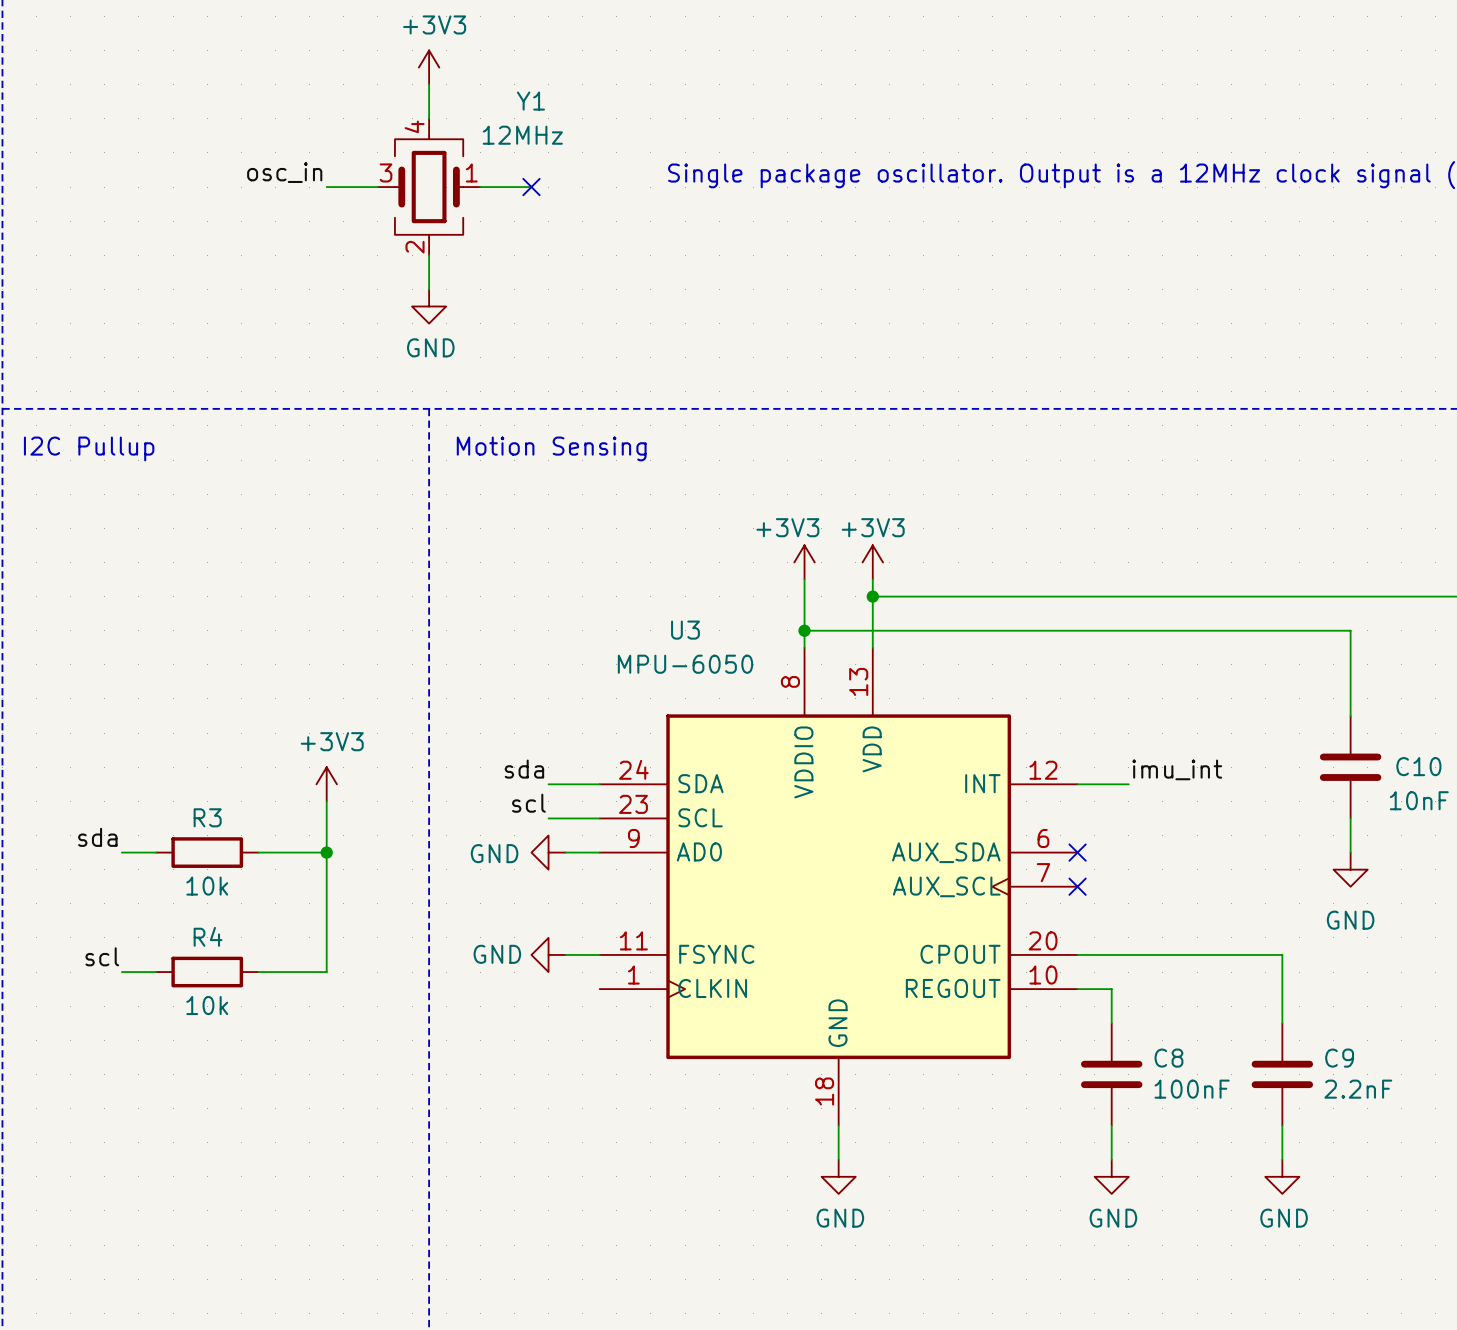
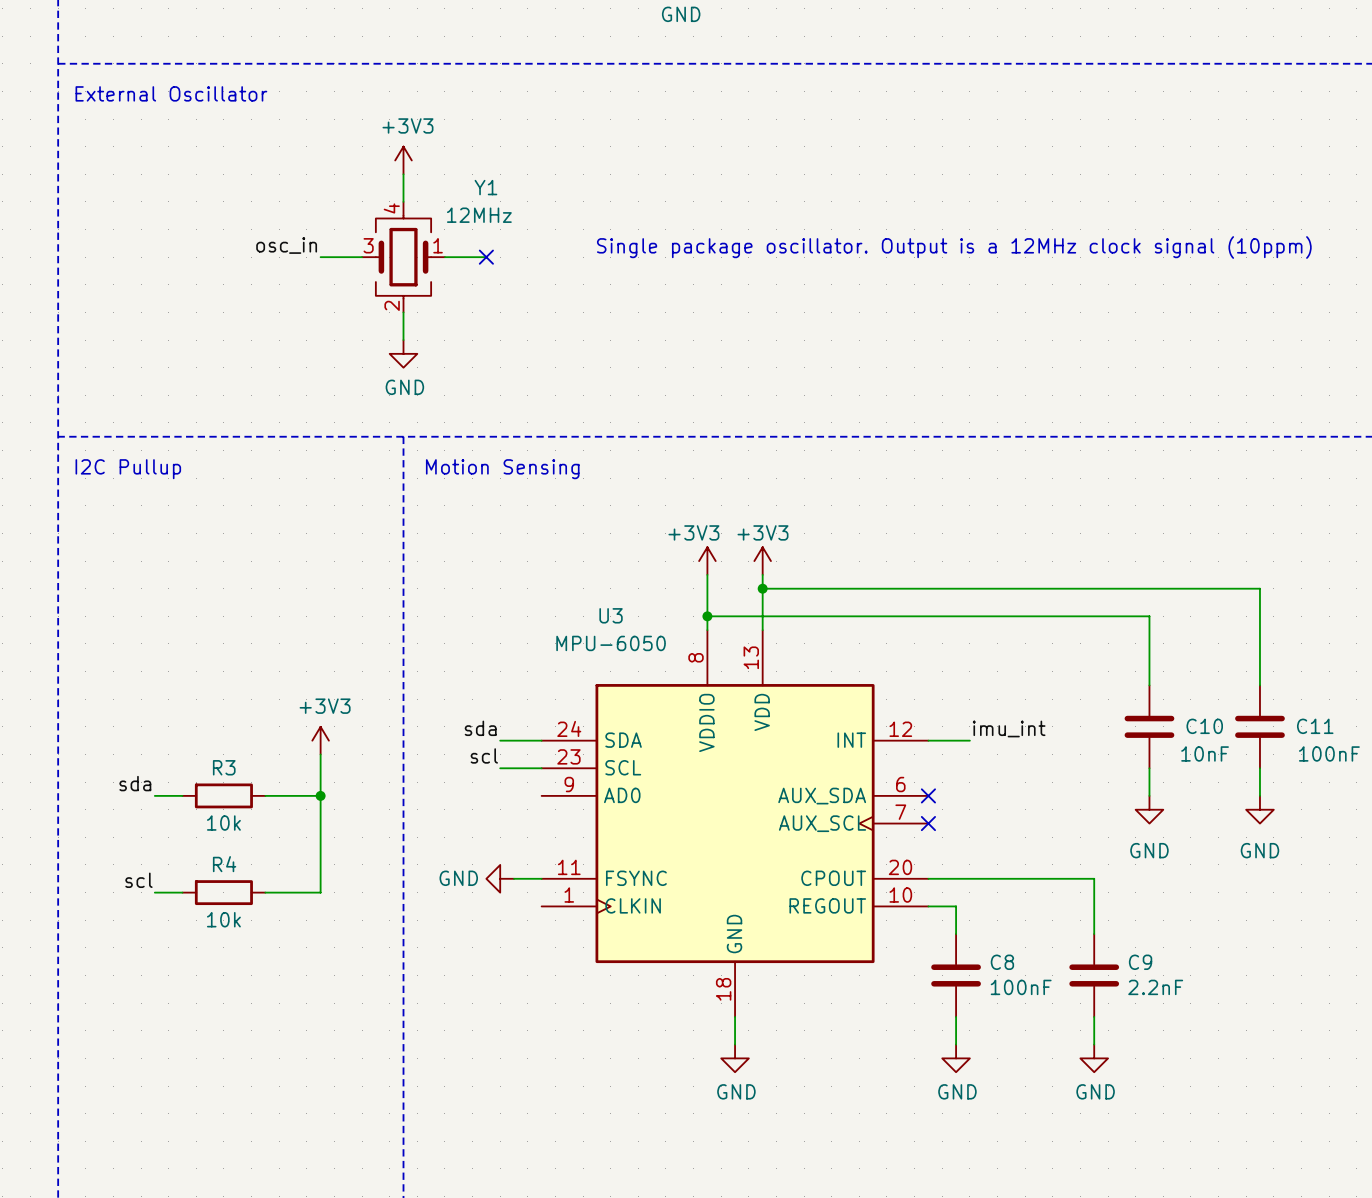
power symbol: GND (548, 852) -> none
wire: (565, 852) (599, 852) -> none

